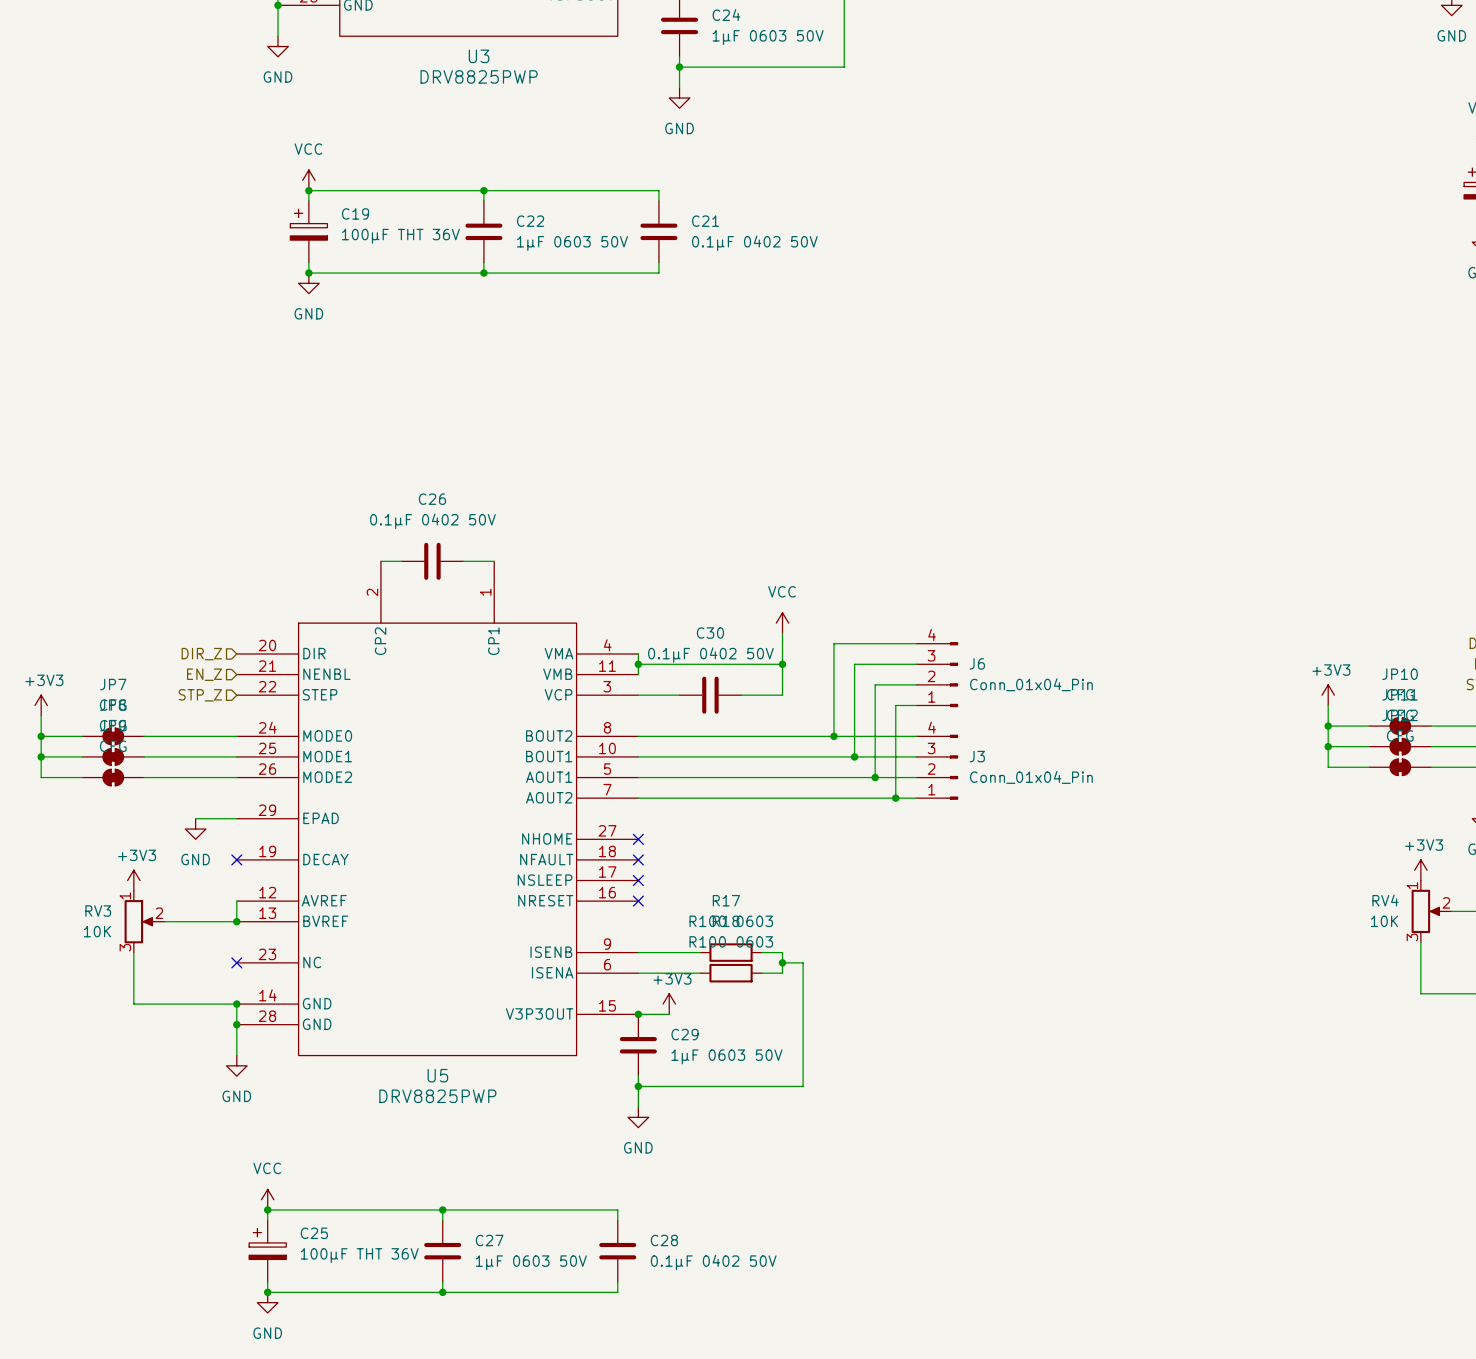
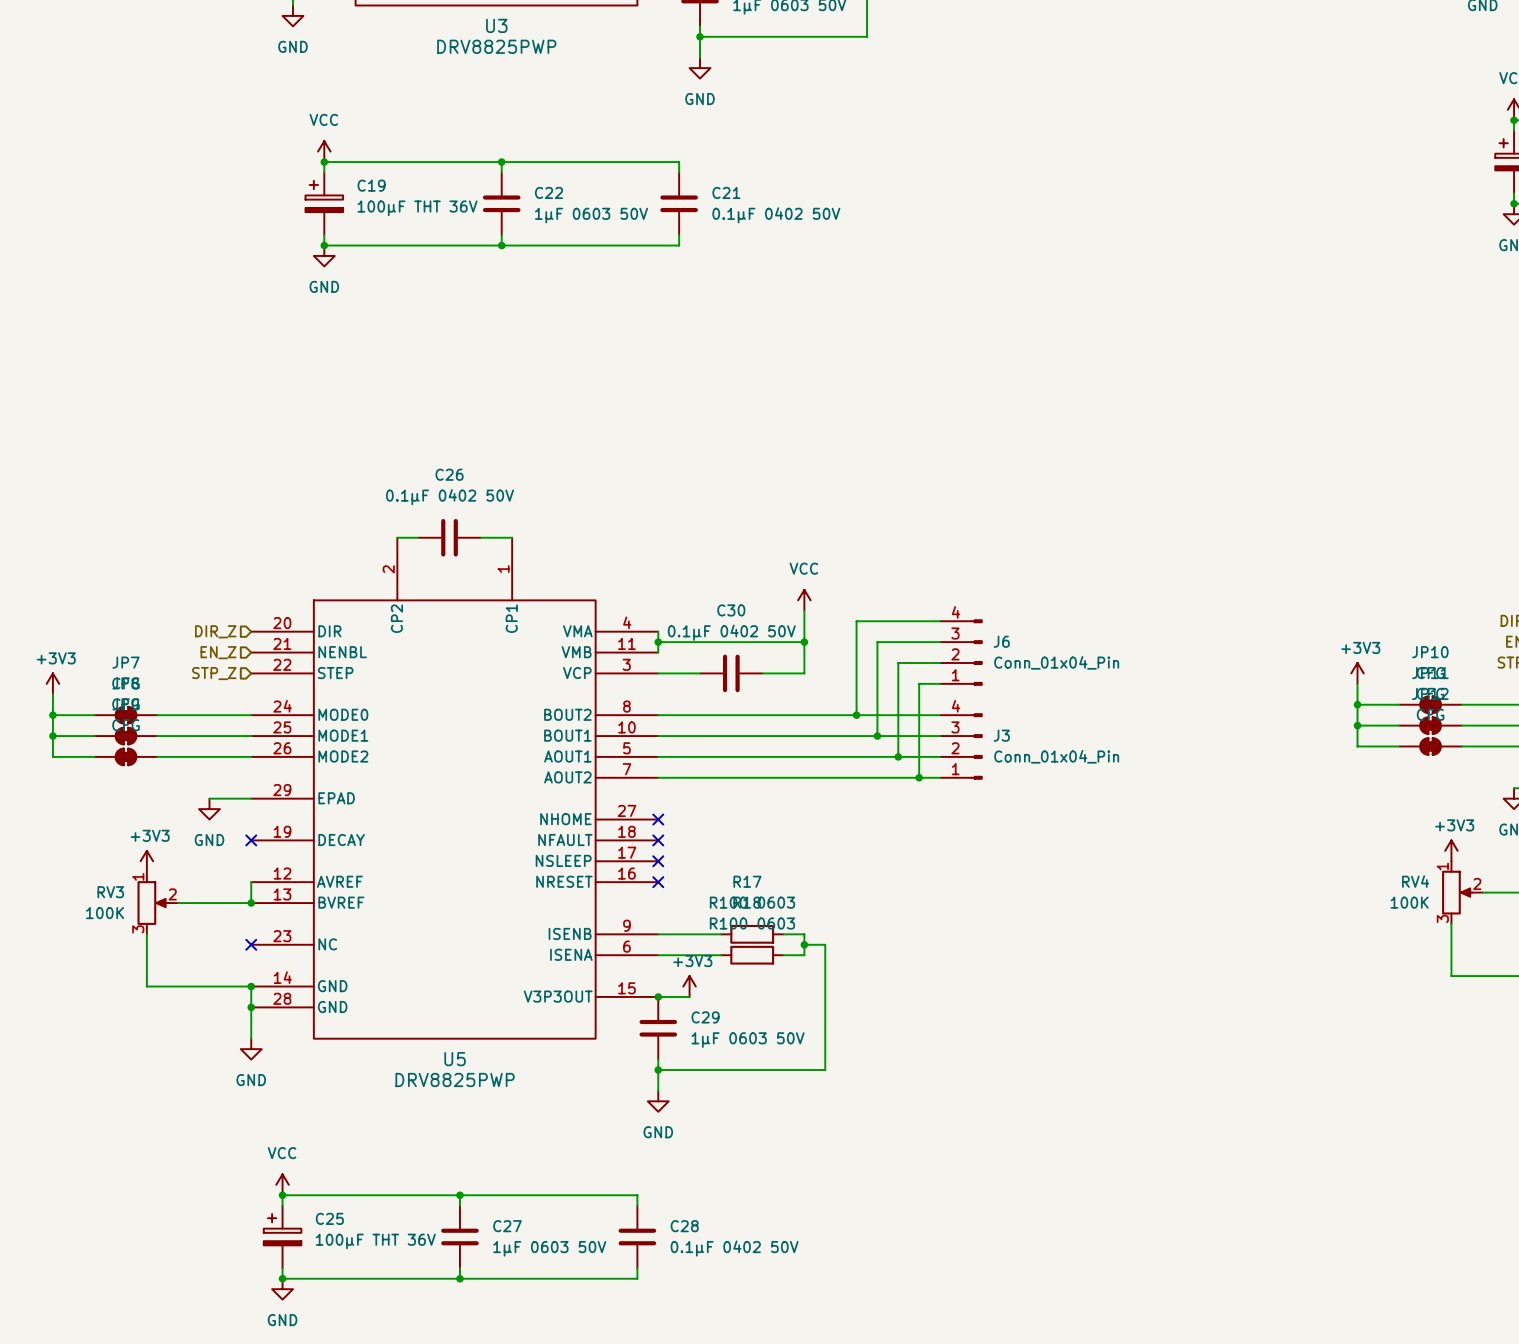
RV4 value: 10K (1384, 921) -> 100K (1409, 902)
RV3 value: 10K (97, 931) -> 100K (105, 913)

